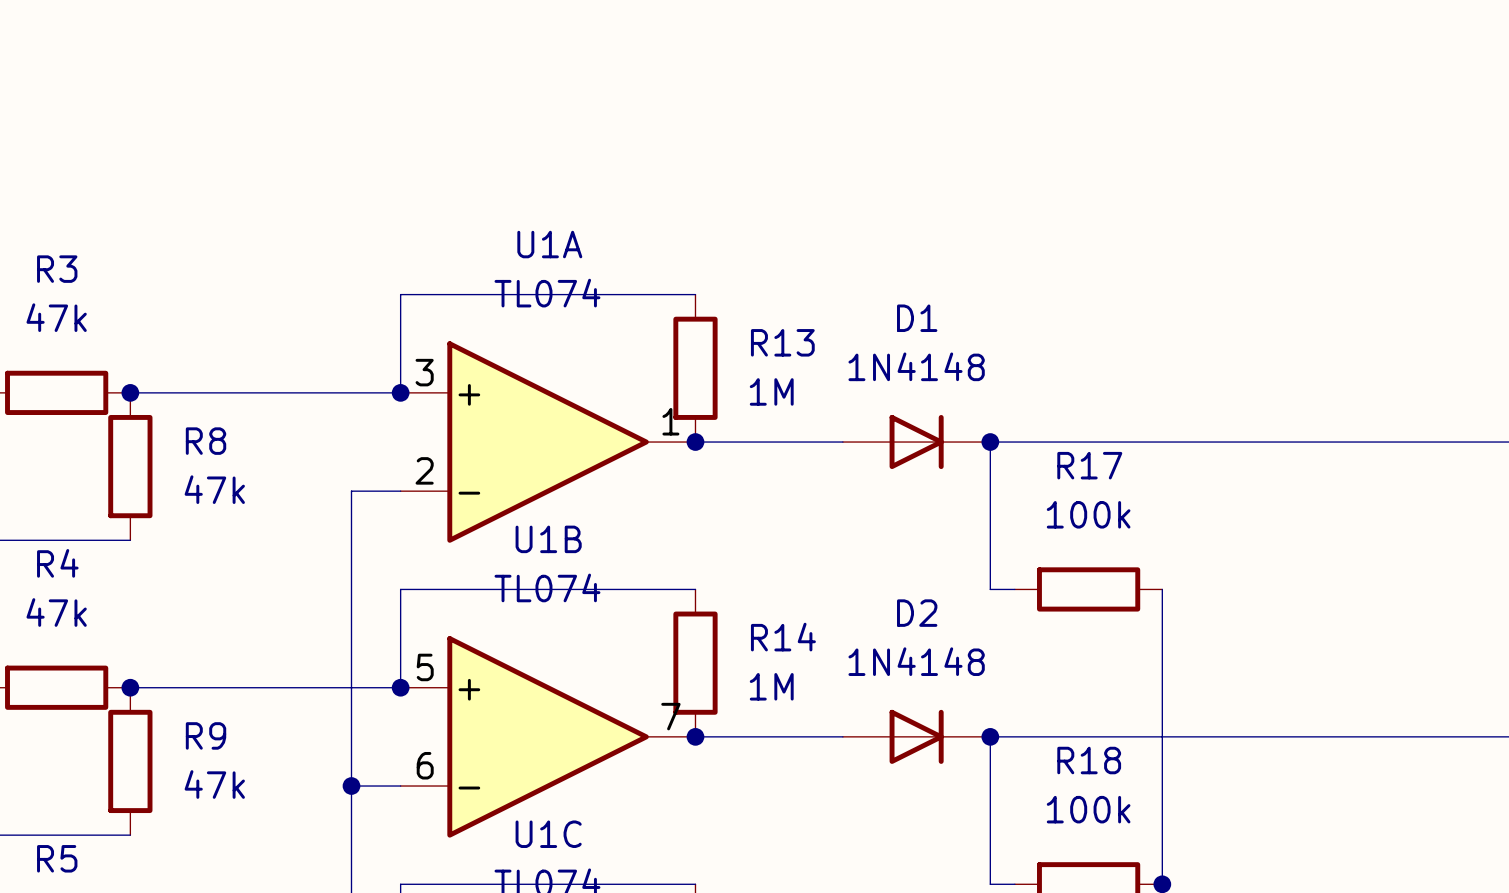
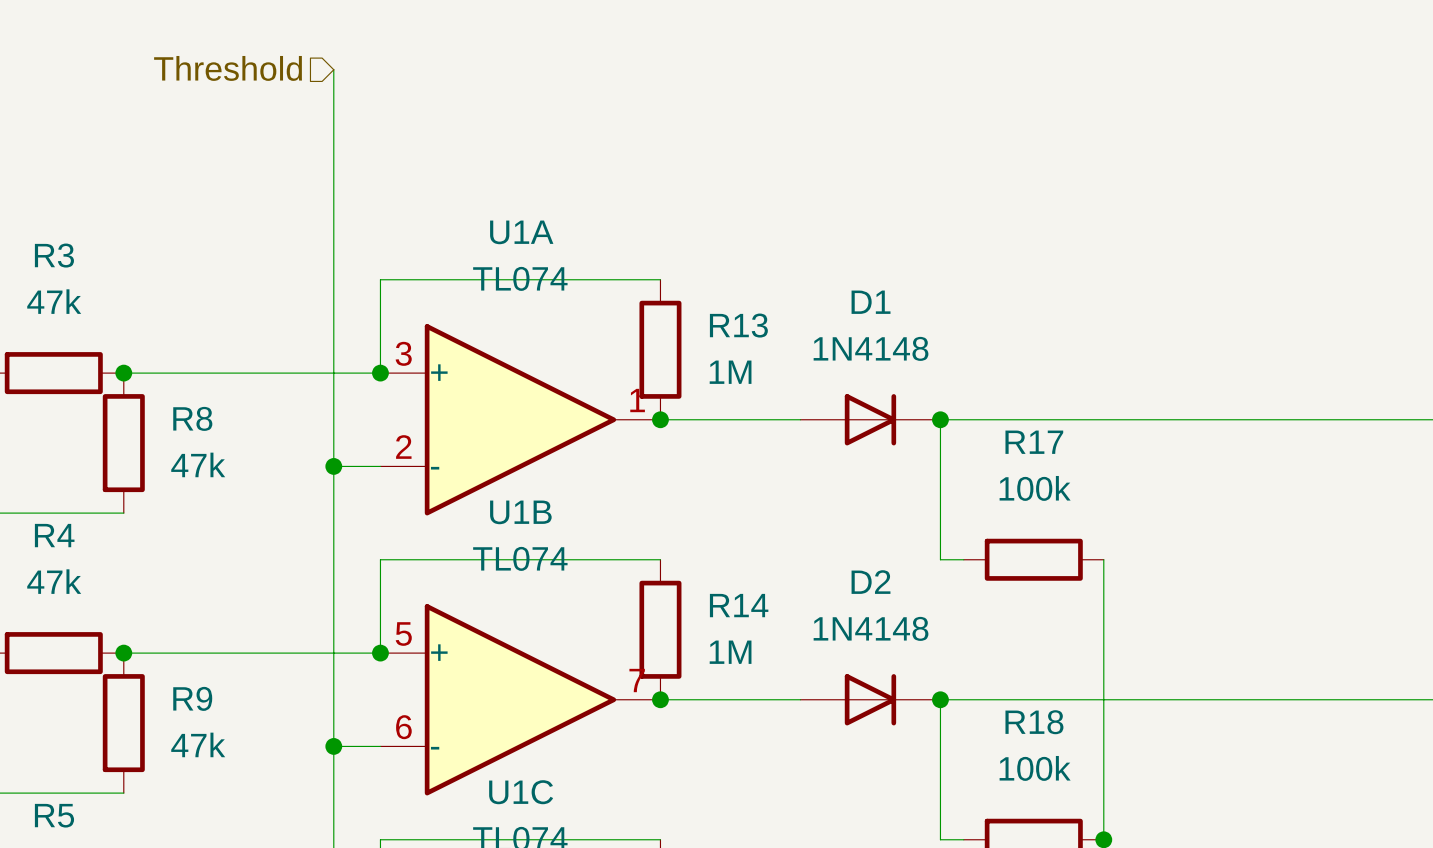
hierarchical label: none -> Threshold (228, 68)
wire: none -> (333, 69) (333, 466)
junction: none -> (333, 466)

